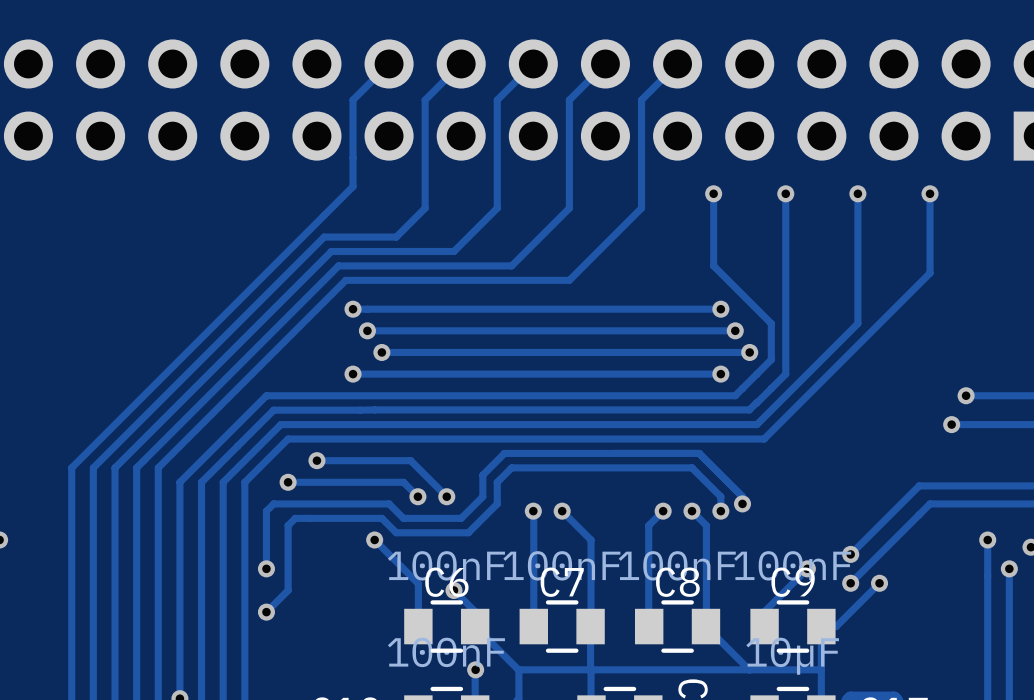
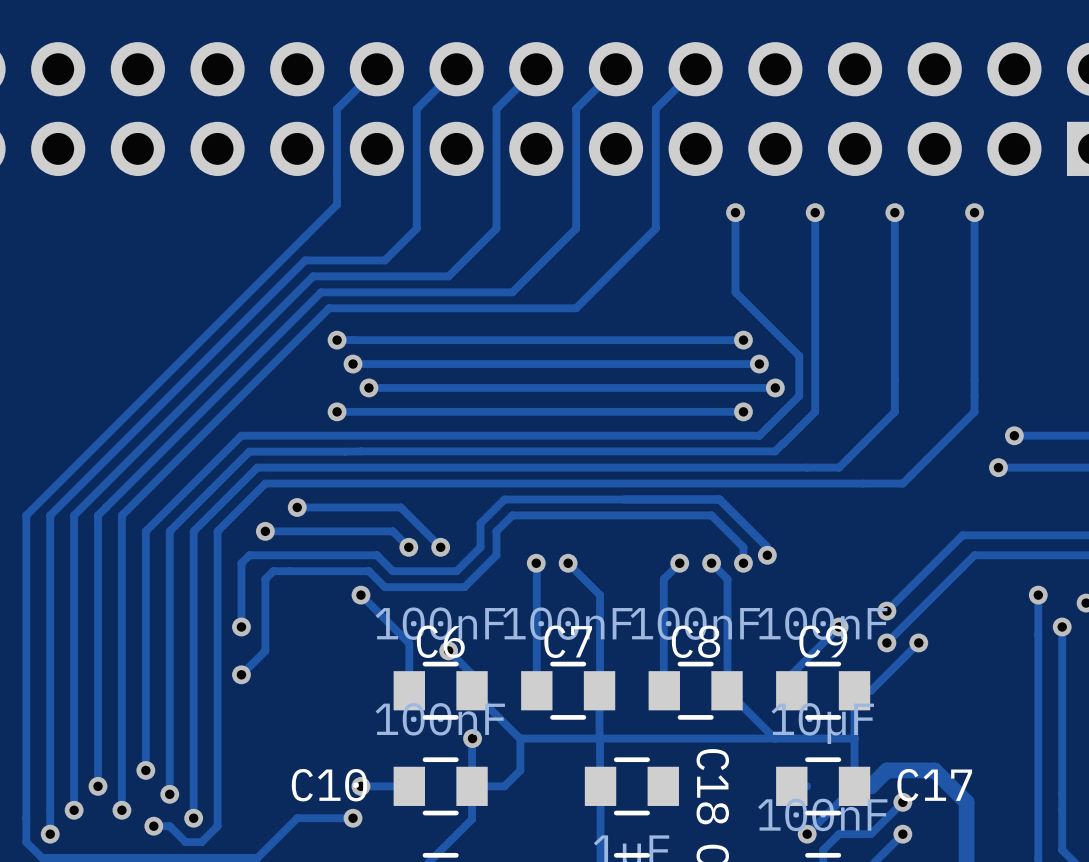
track: (930, 273) (764, 439) -> (974, 300) (974, 411) (902, 483) (791, 483)
track: (857, 323) (756, 424) -> (894, 356) (894, 411) (839, 467) (783, 467)

